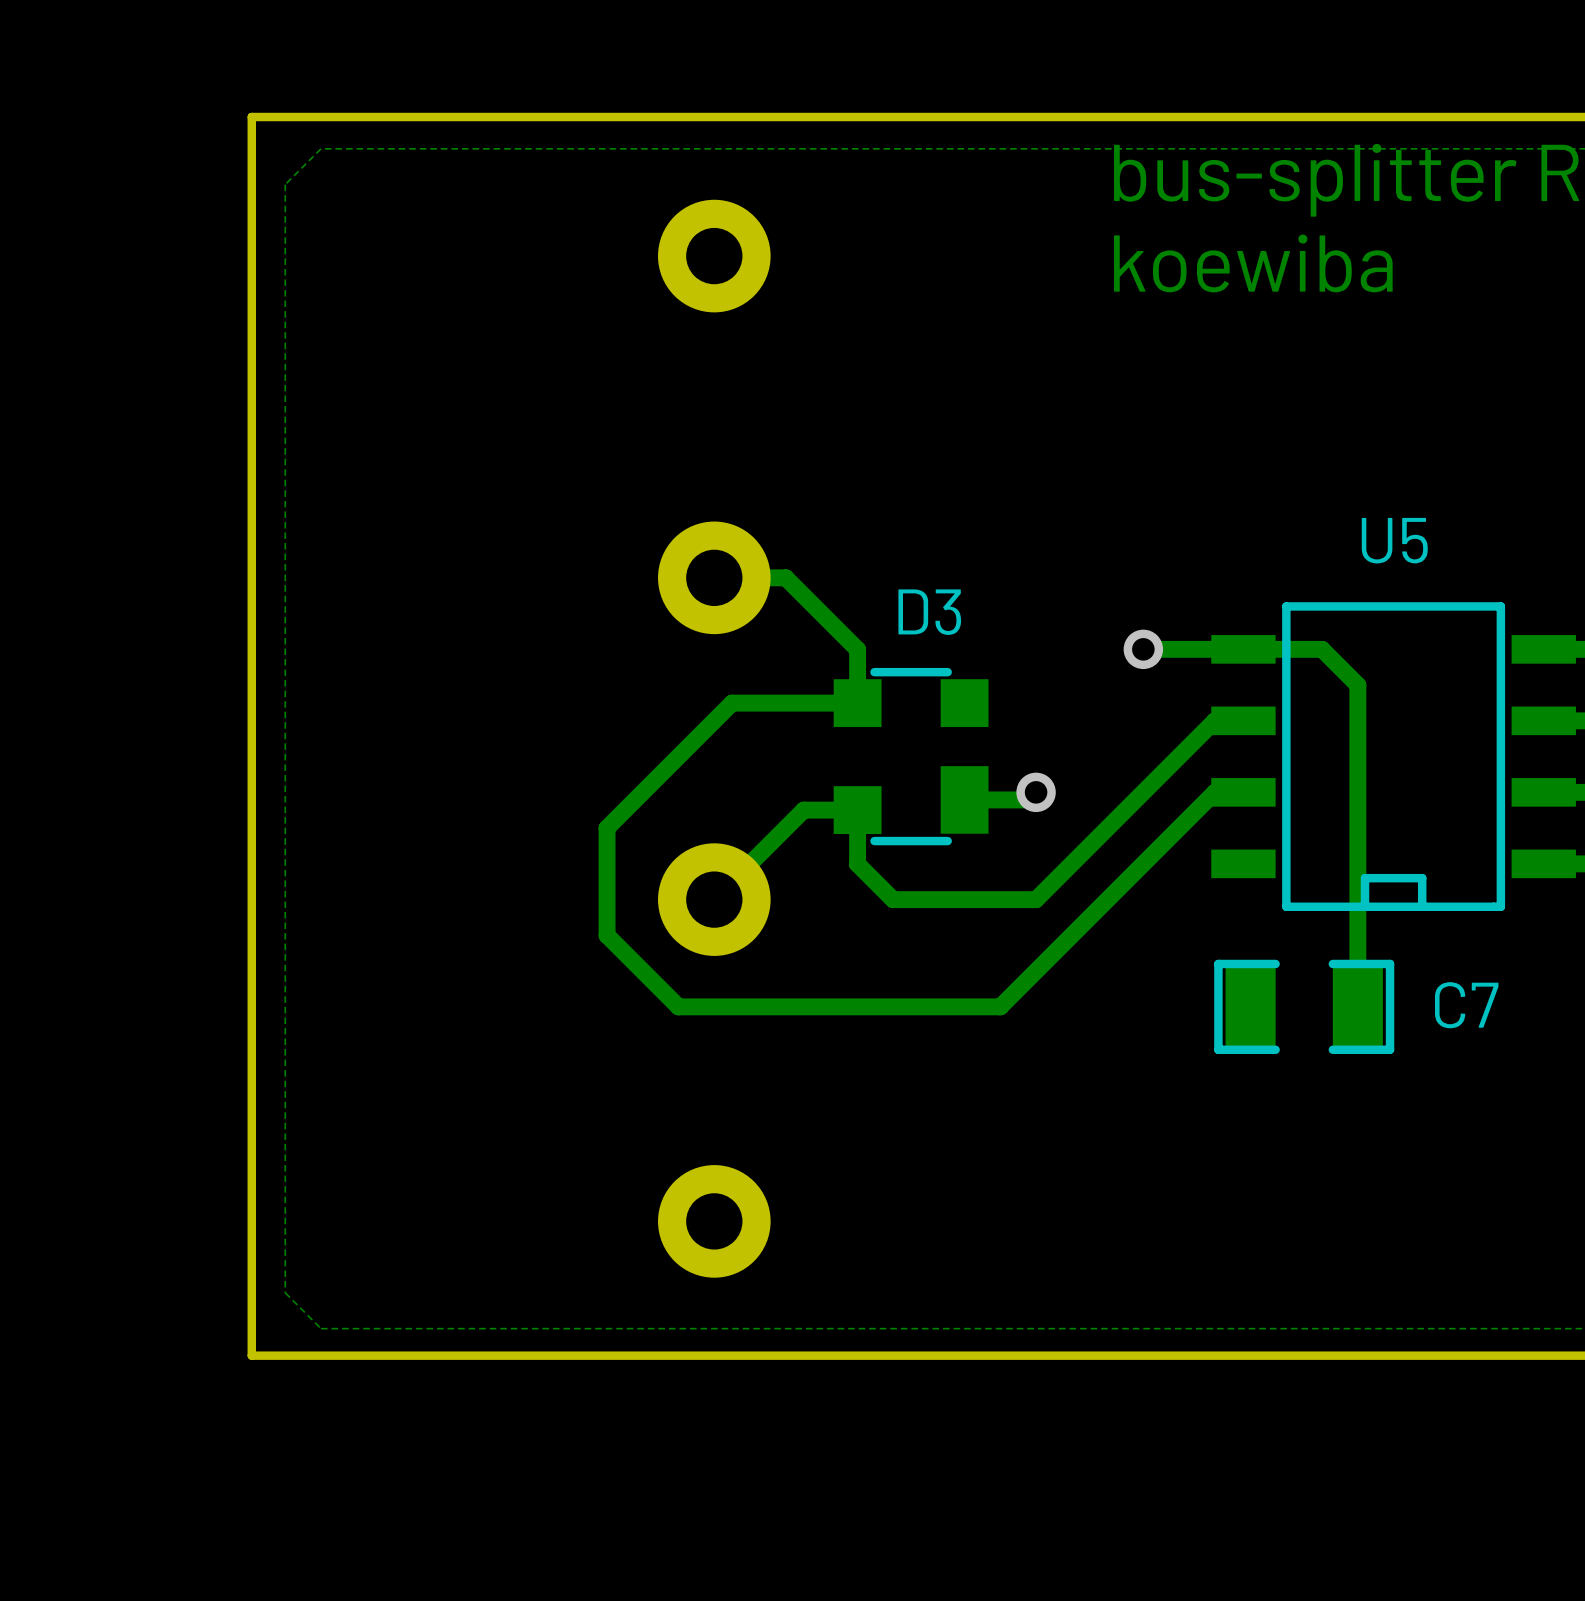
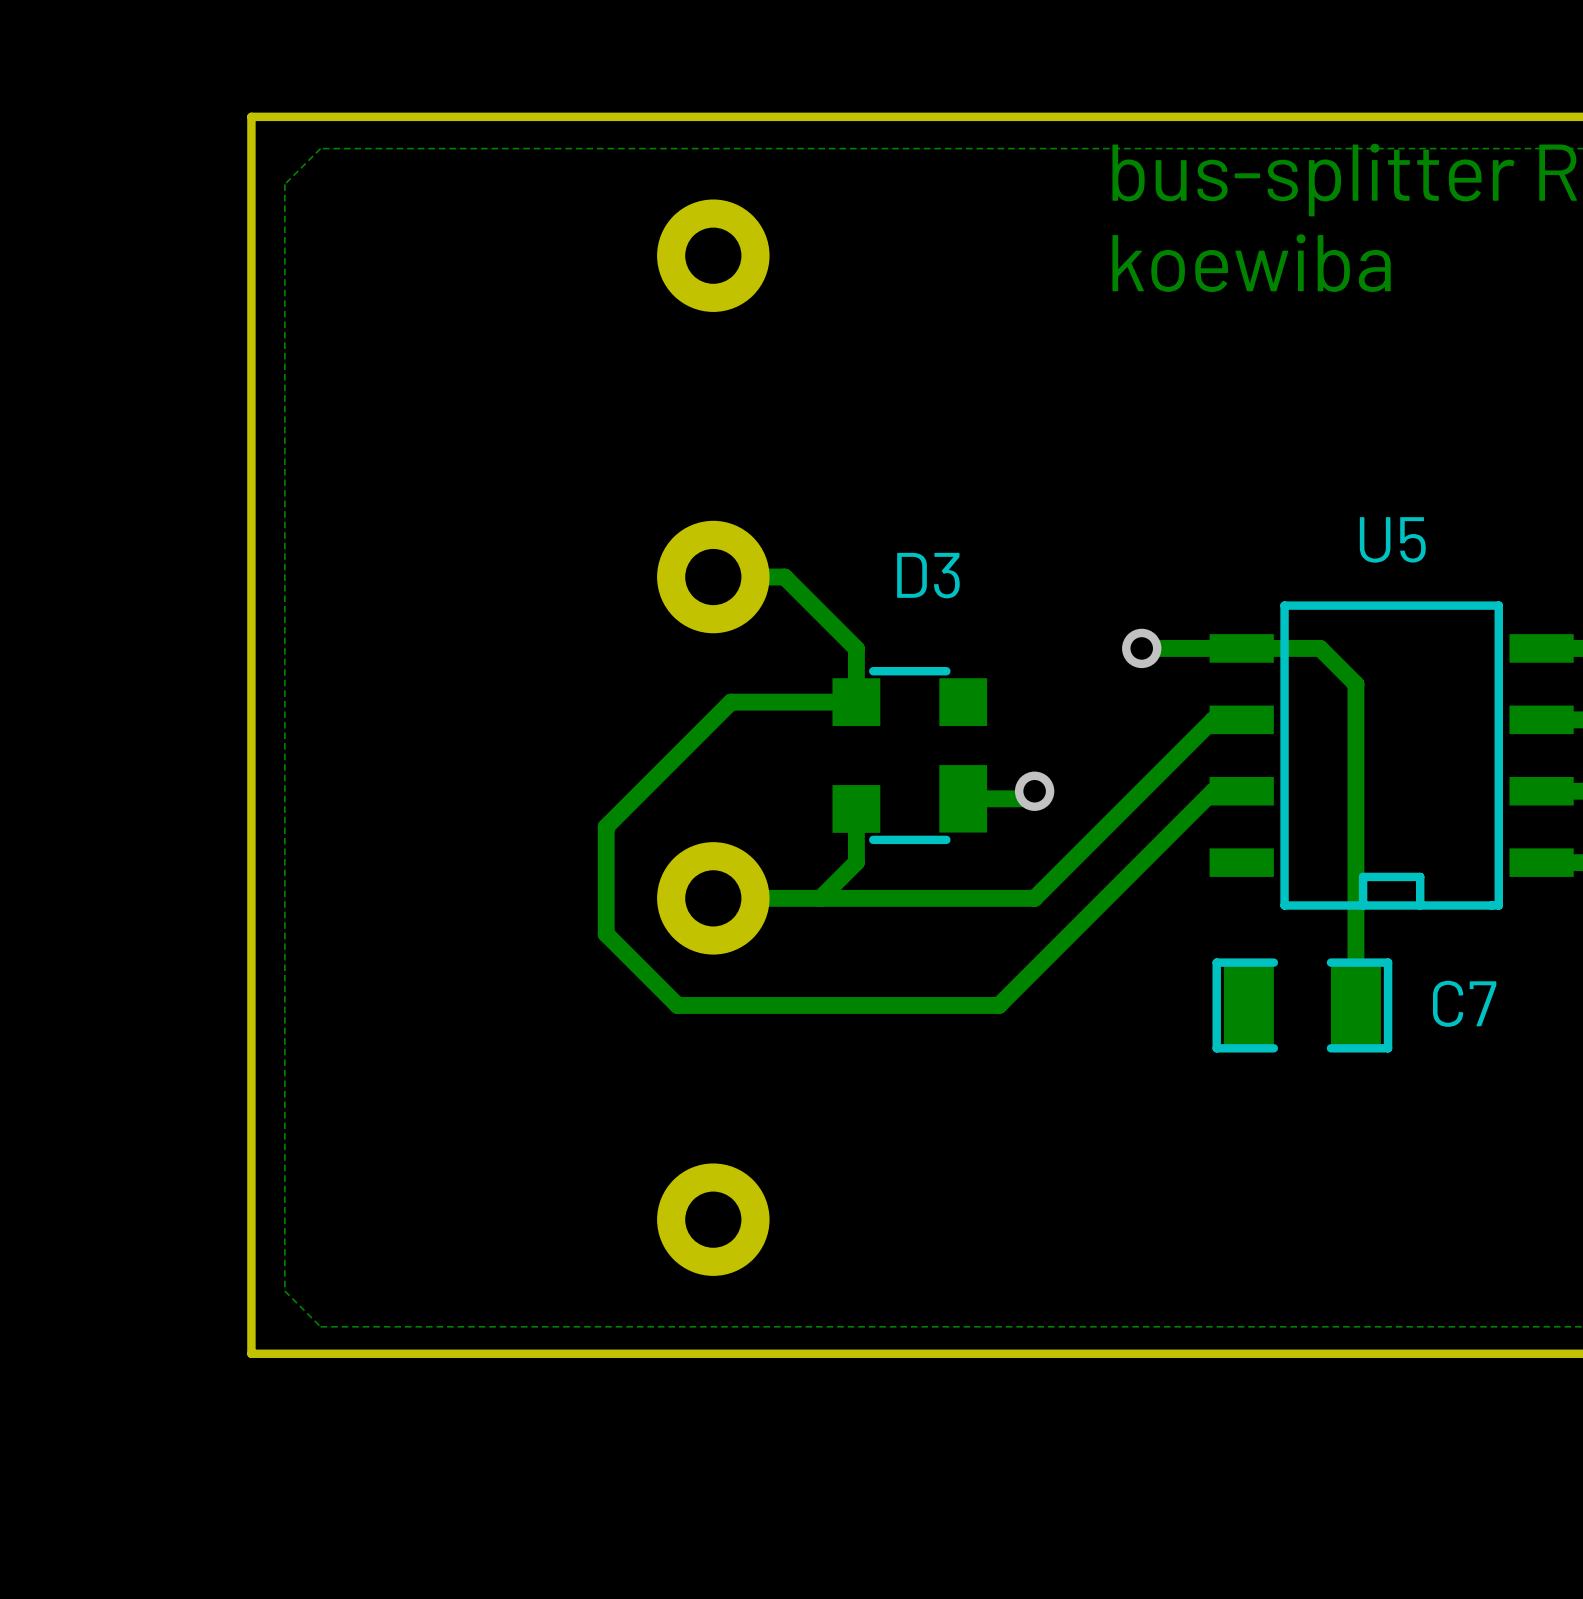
D3 name position: D3 (929, 612) -> D3 (928, 575)
track: (857, 810) (803, 810) (714, 899) -> (891, 898) (713, 898)
track: (857, 863) (893, 899) -> (856, 862) (820, 898)

